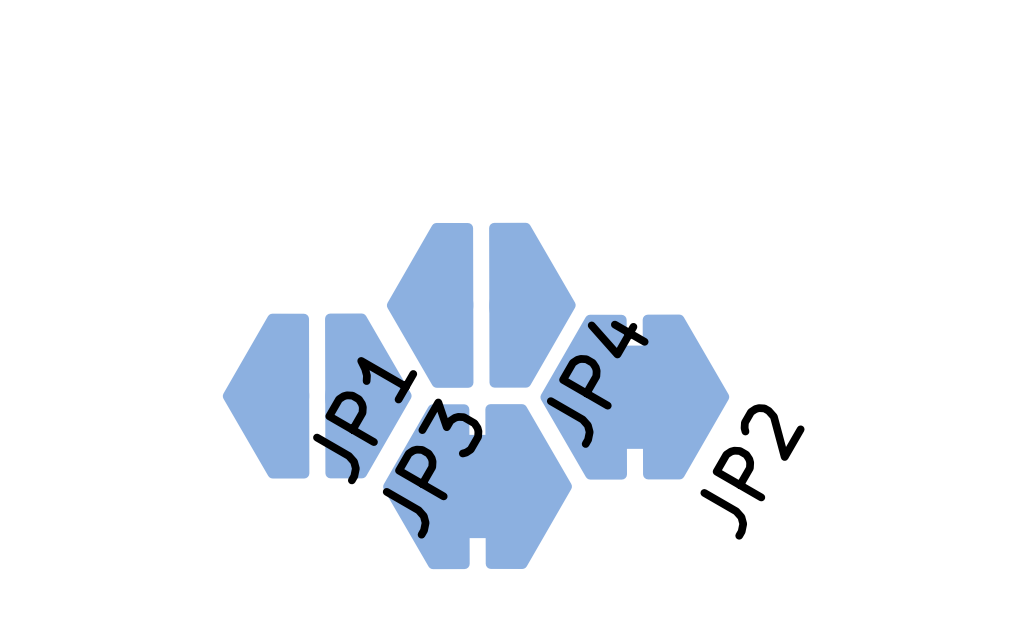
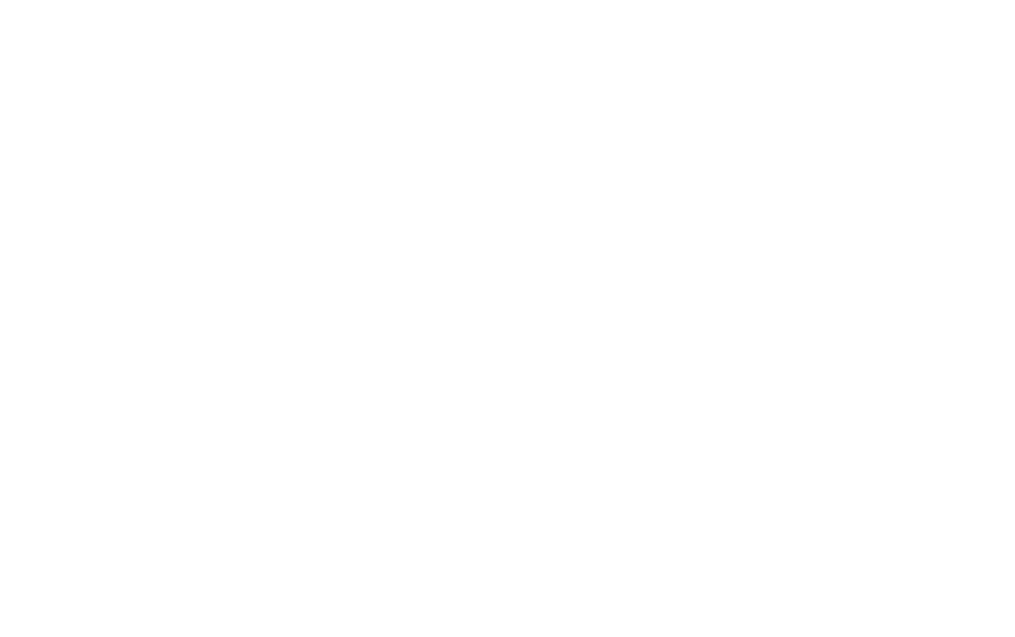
JP4: (481, 305) -> none
JP3: (317, 396) -> none
JP2: (634, 397) -> none
JP1: (477, 486) -> none

